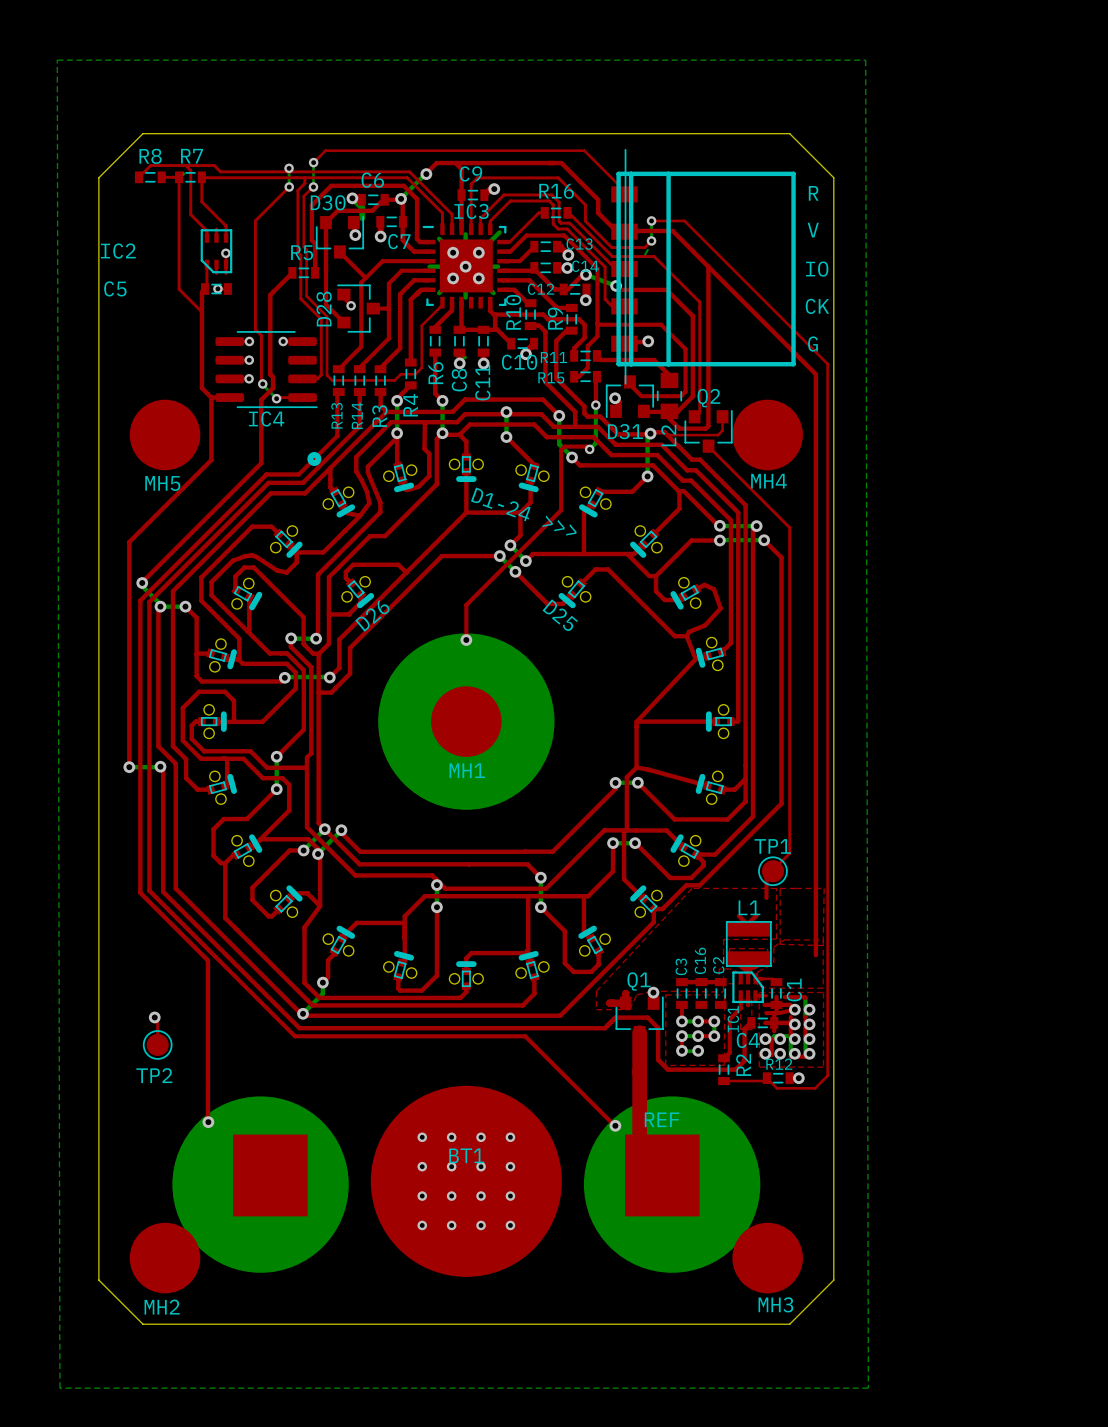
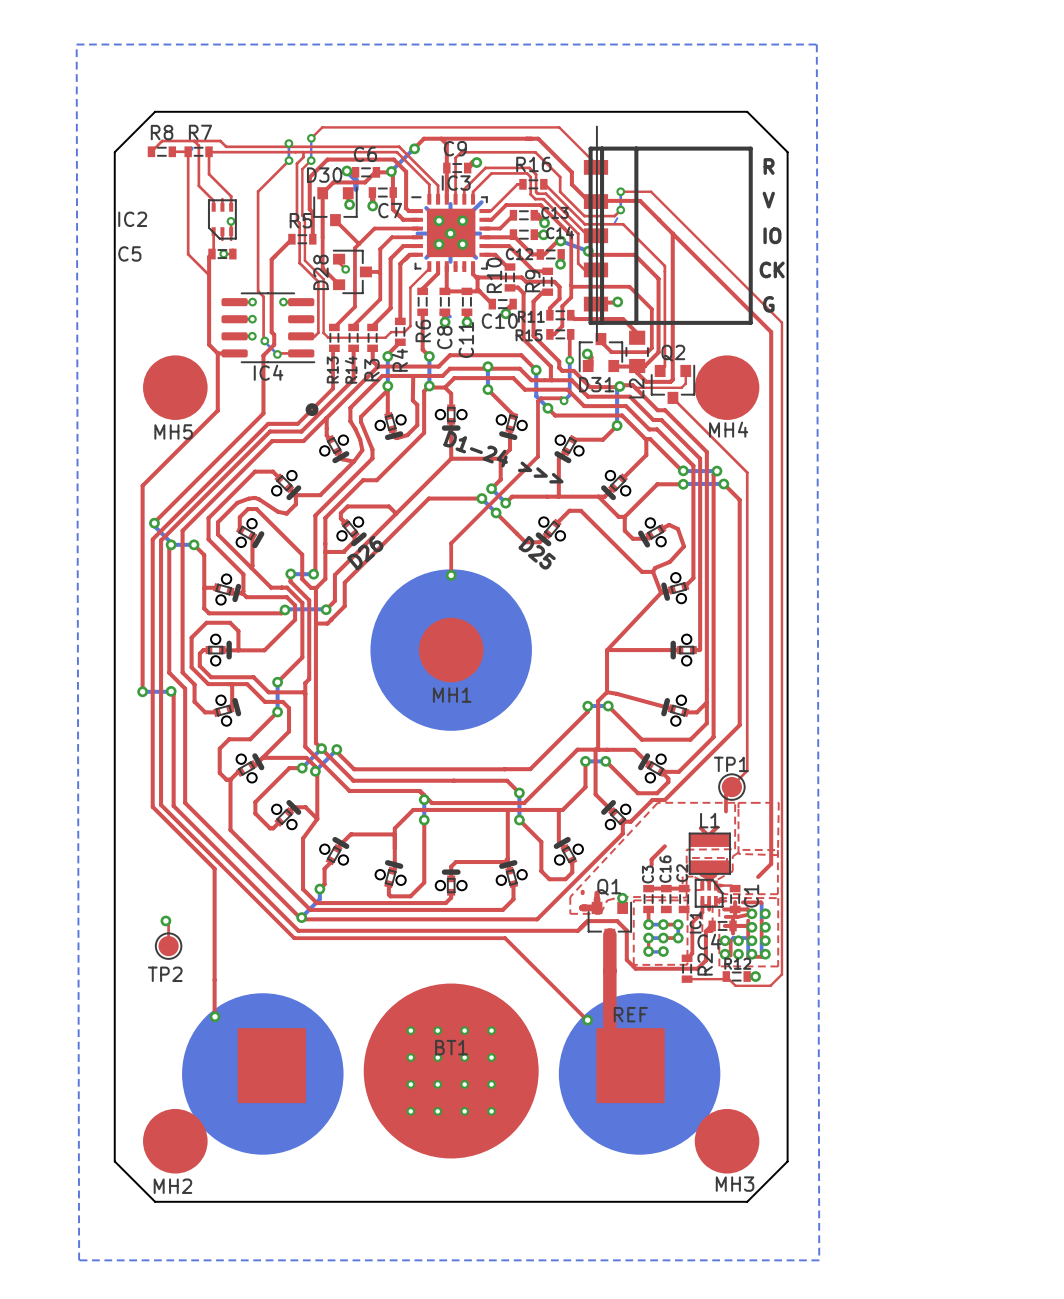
top track: none -> (664, 846) (651, 859) (651, 865)
top track: none -> (771, 863) (758, 876)
top track: none -> (599, 890) (597, 898)
top track: none -> (582, 891) (582, 893)

